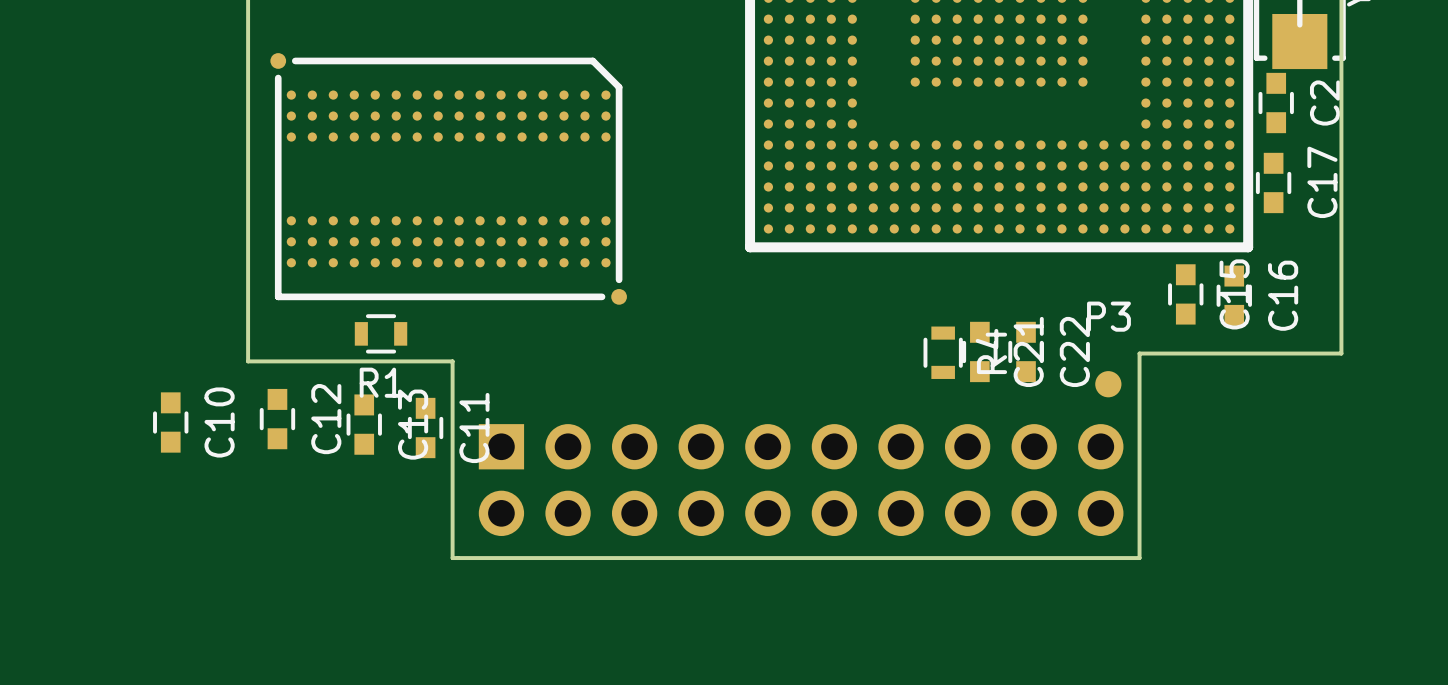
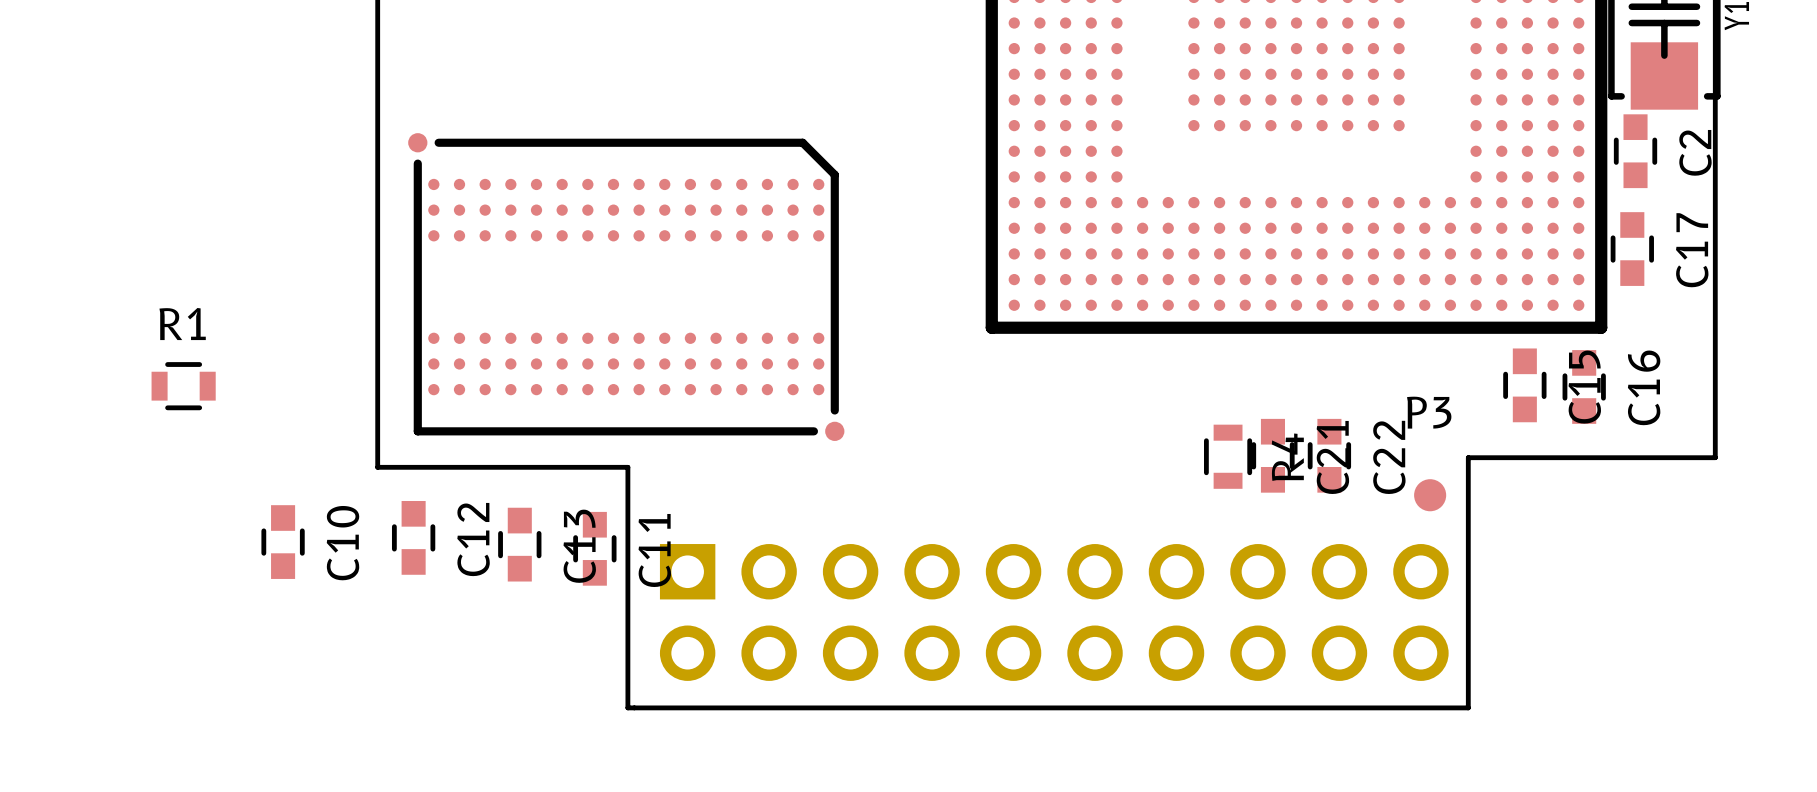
part position: (448, 178) -> (626, 287)
R1 position: (381, 333) -> (183, 386)
R1 name position: R1 (381, 382) -> R1 (182, 324)

